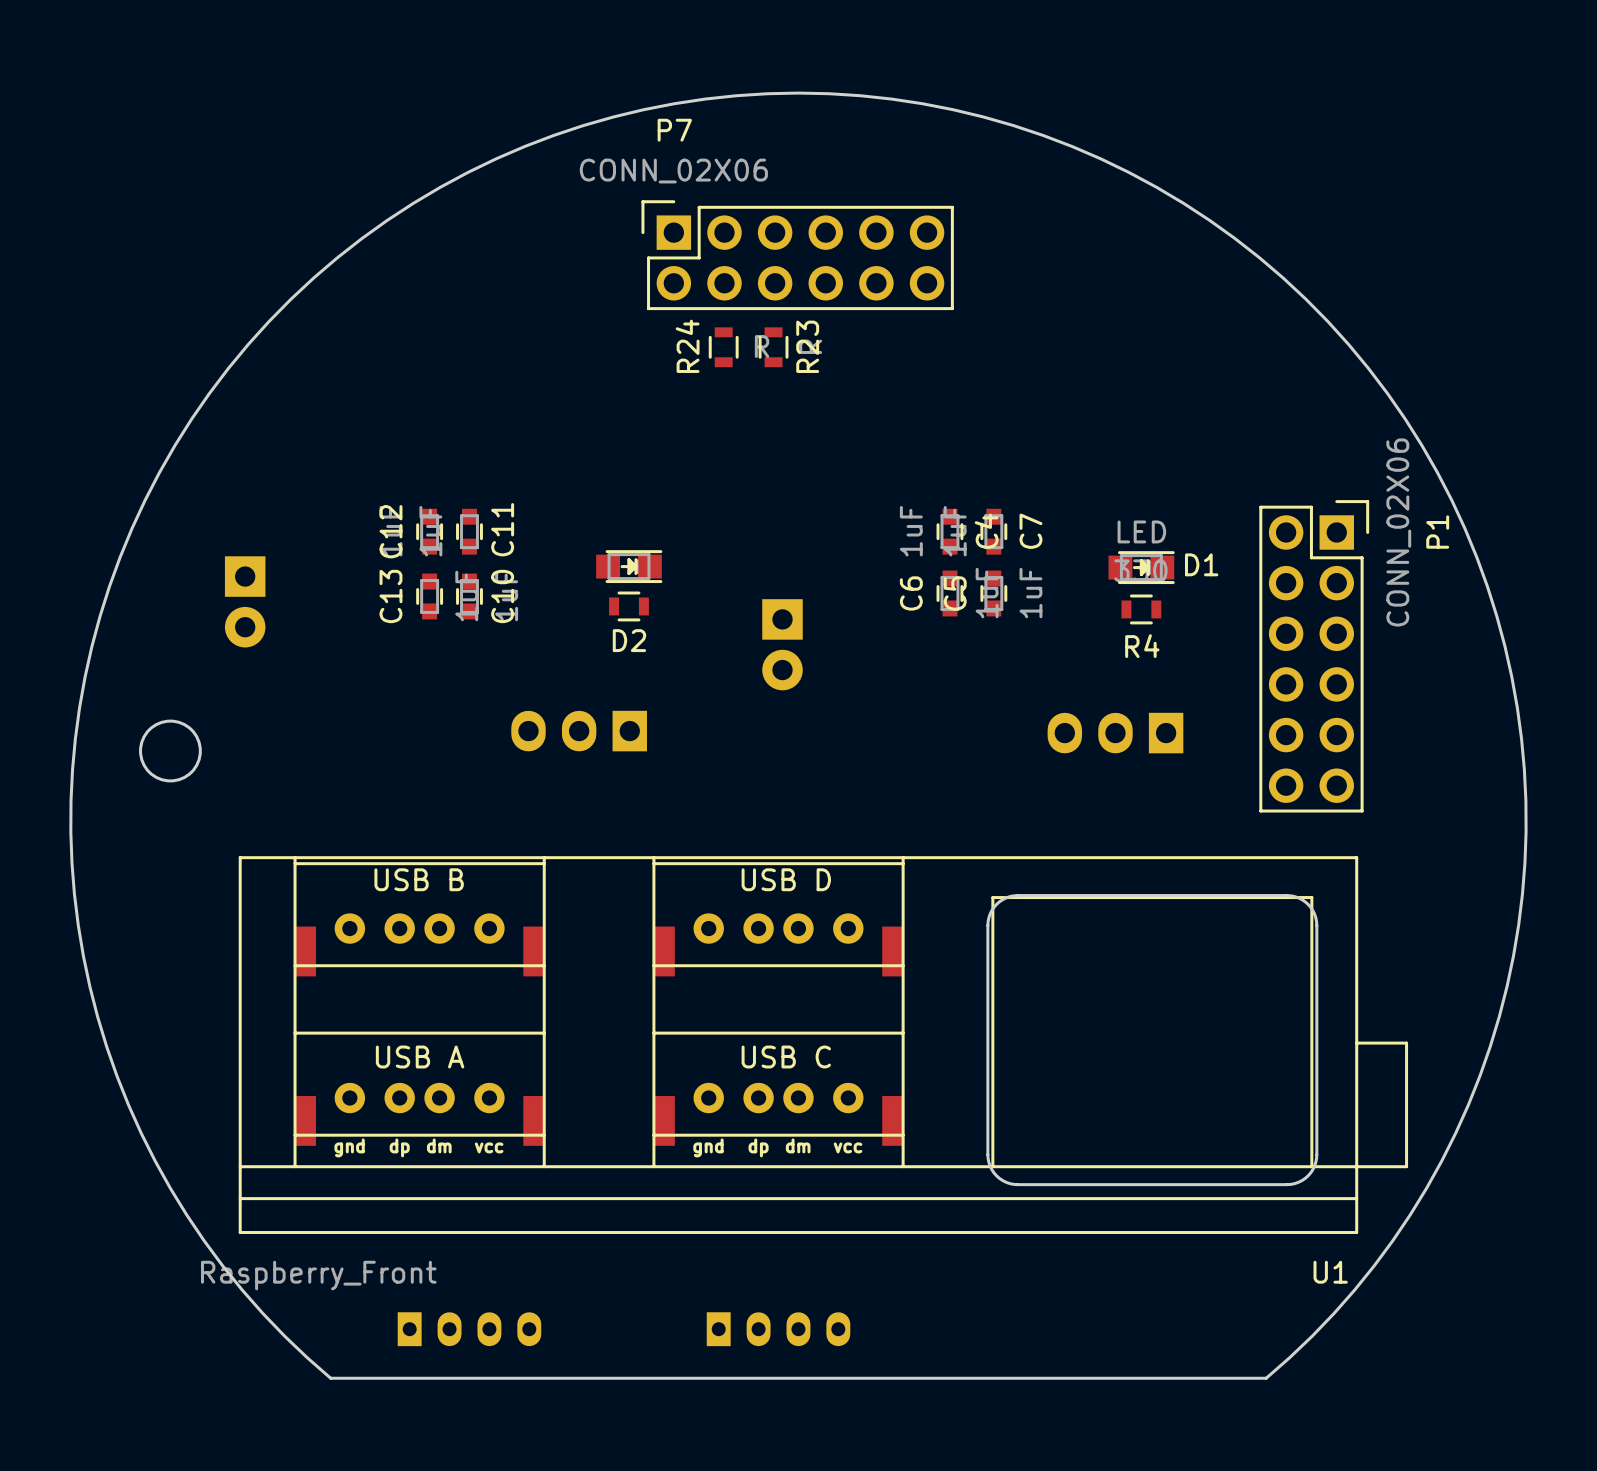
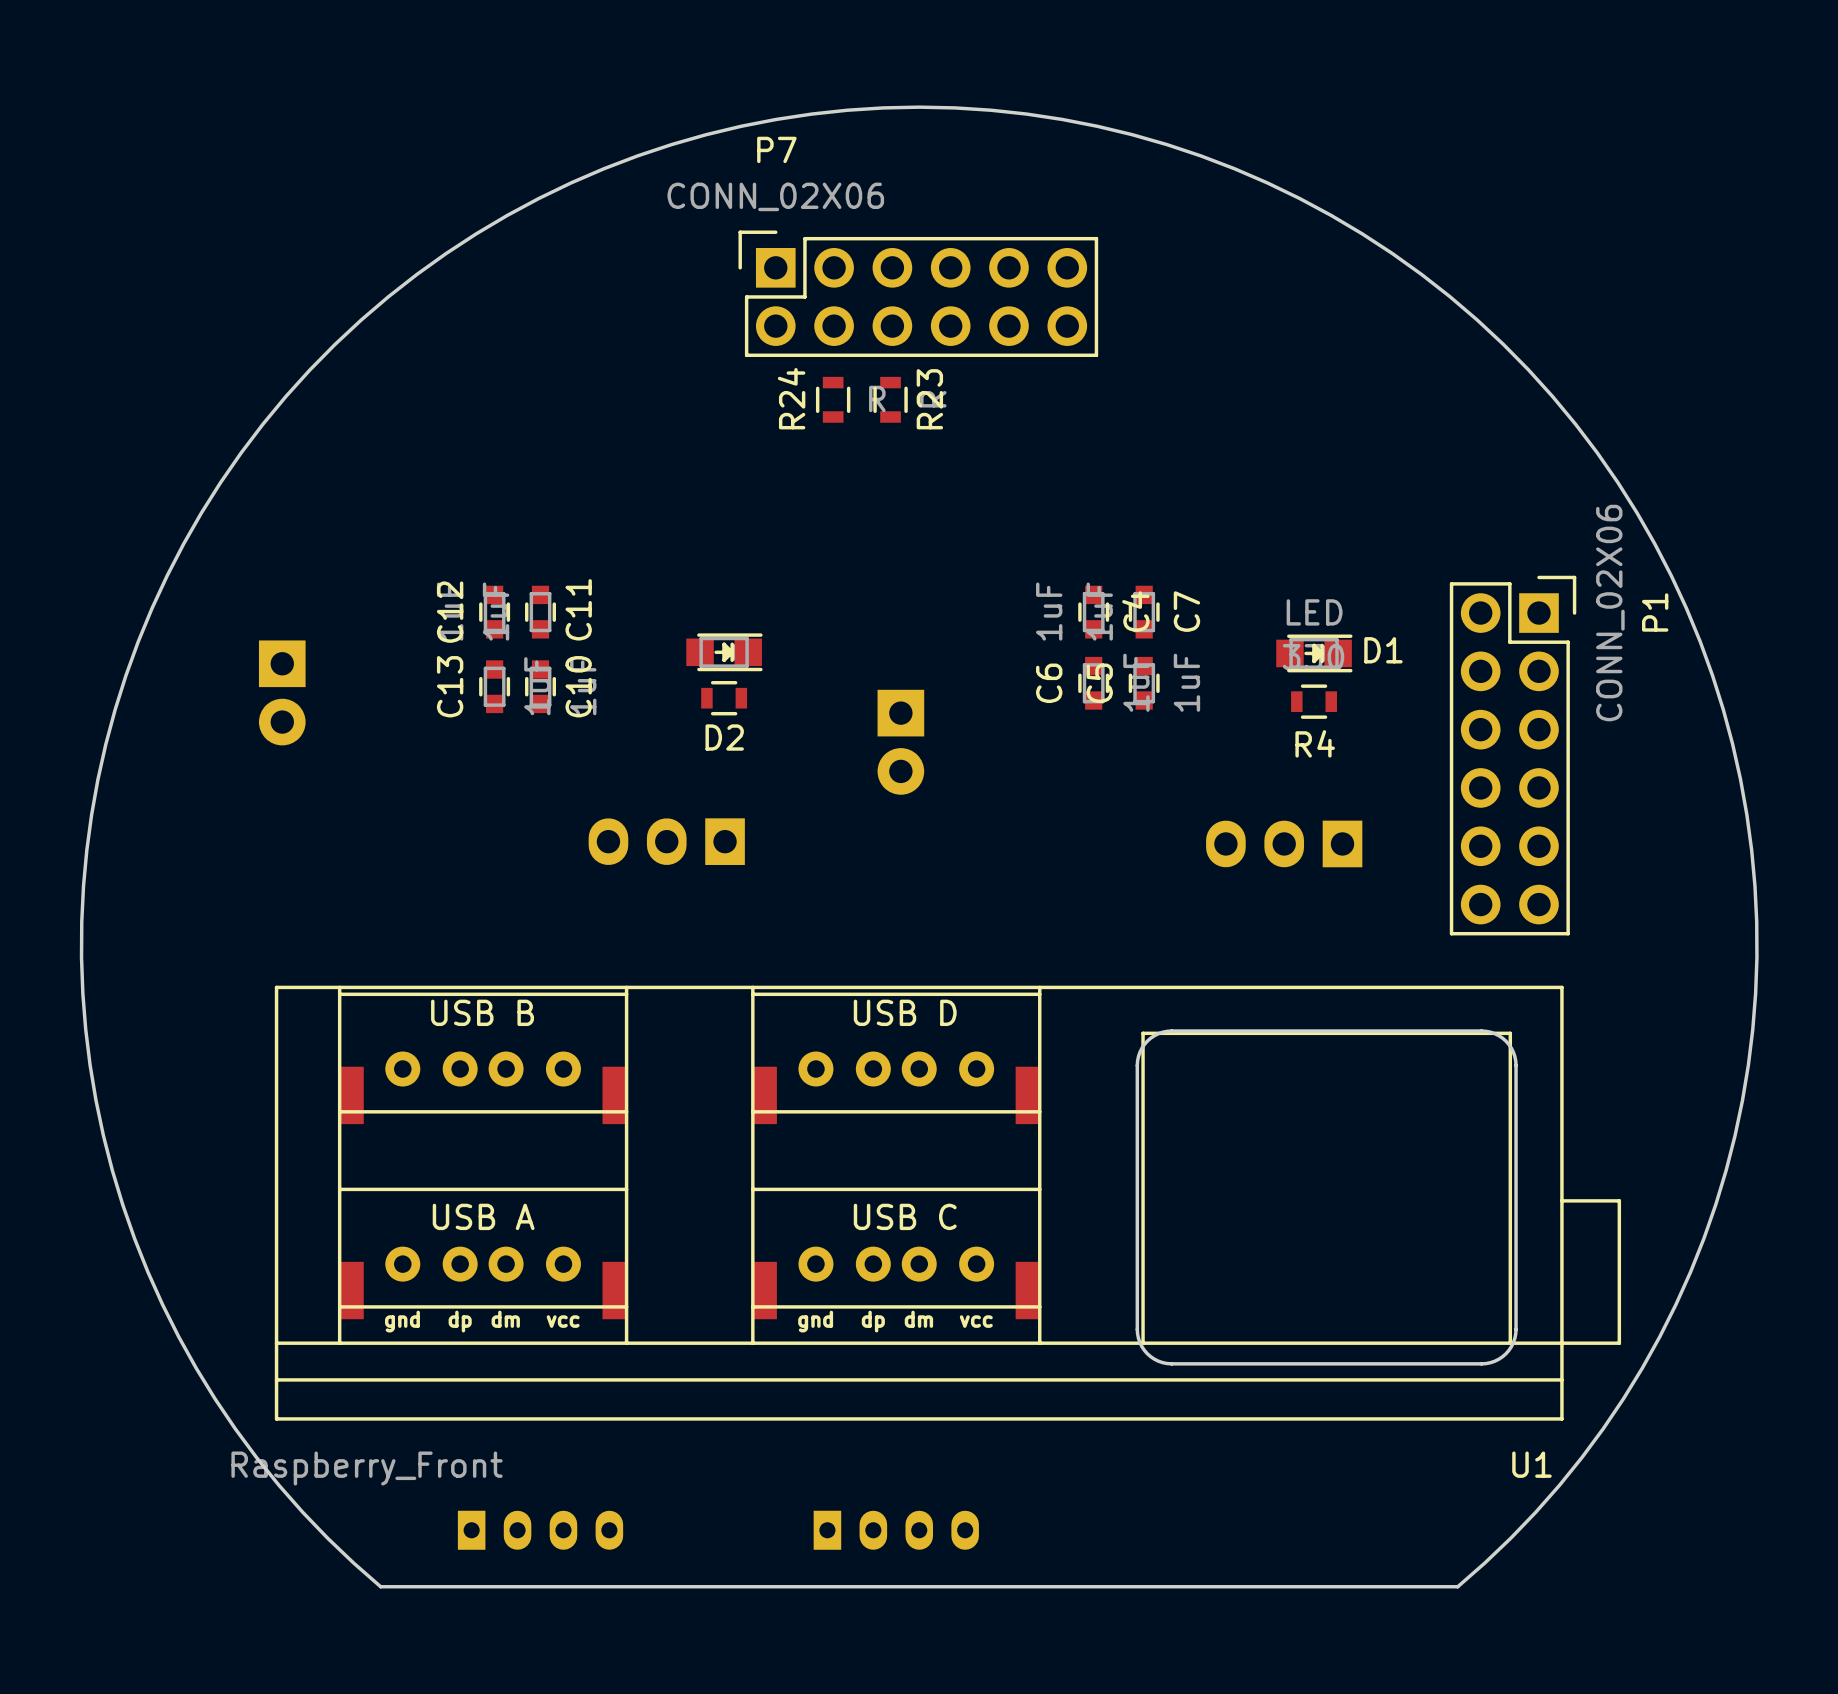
round board edge: [139, 719, 202, 783] -> none

